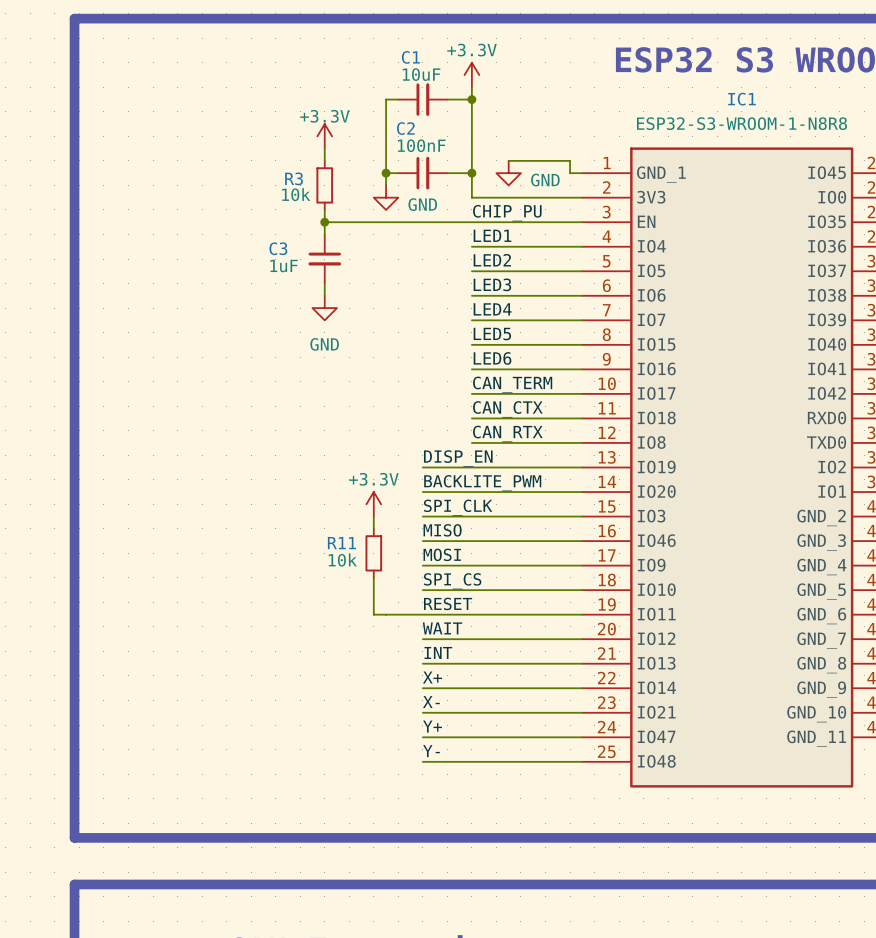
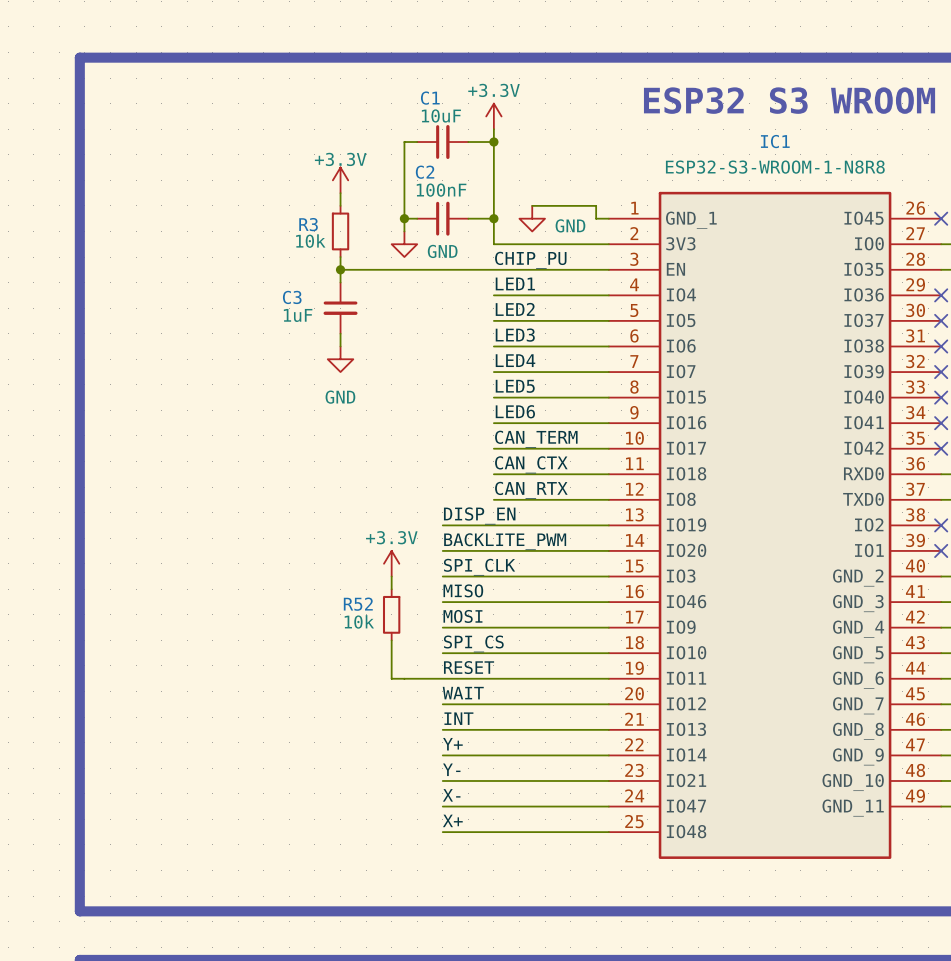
R11 name: R11 (341, 543) -> R52 (358, 604)
label: X+ (432, 677) -> Y+ (452, 744)
label: X- (431, 702) -> Y- (451, 769)
label: Y+ (432, 726) -> X- (451, 795)
label: Y- (431, 751) -> X+ (452, 820)

